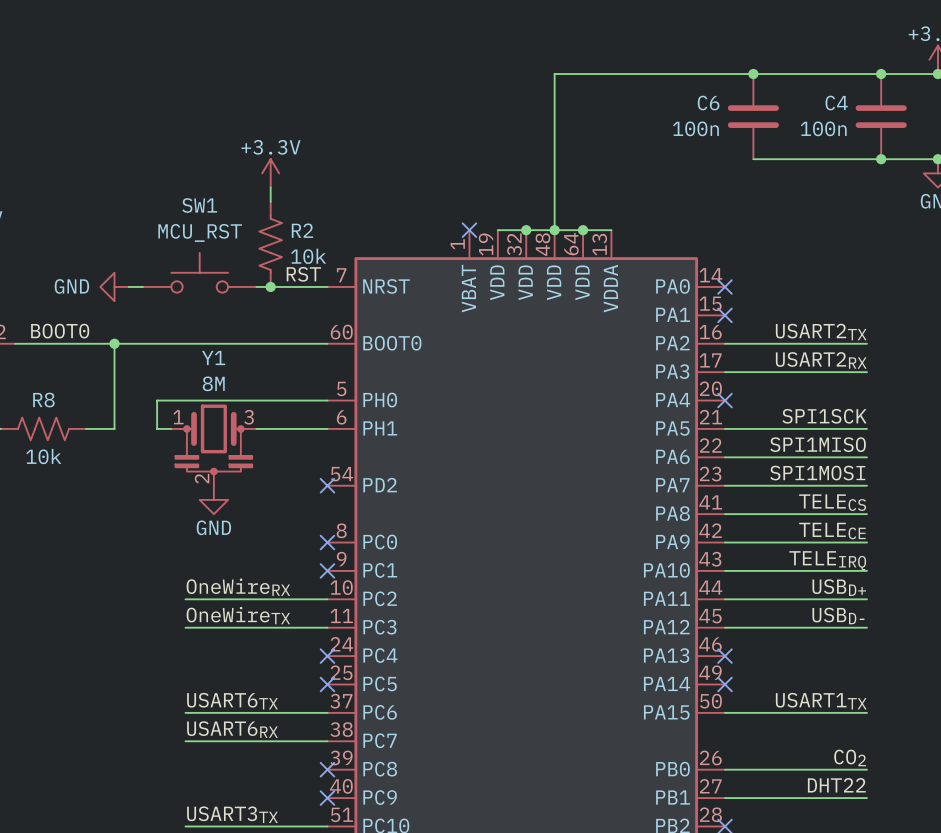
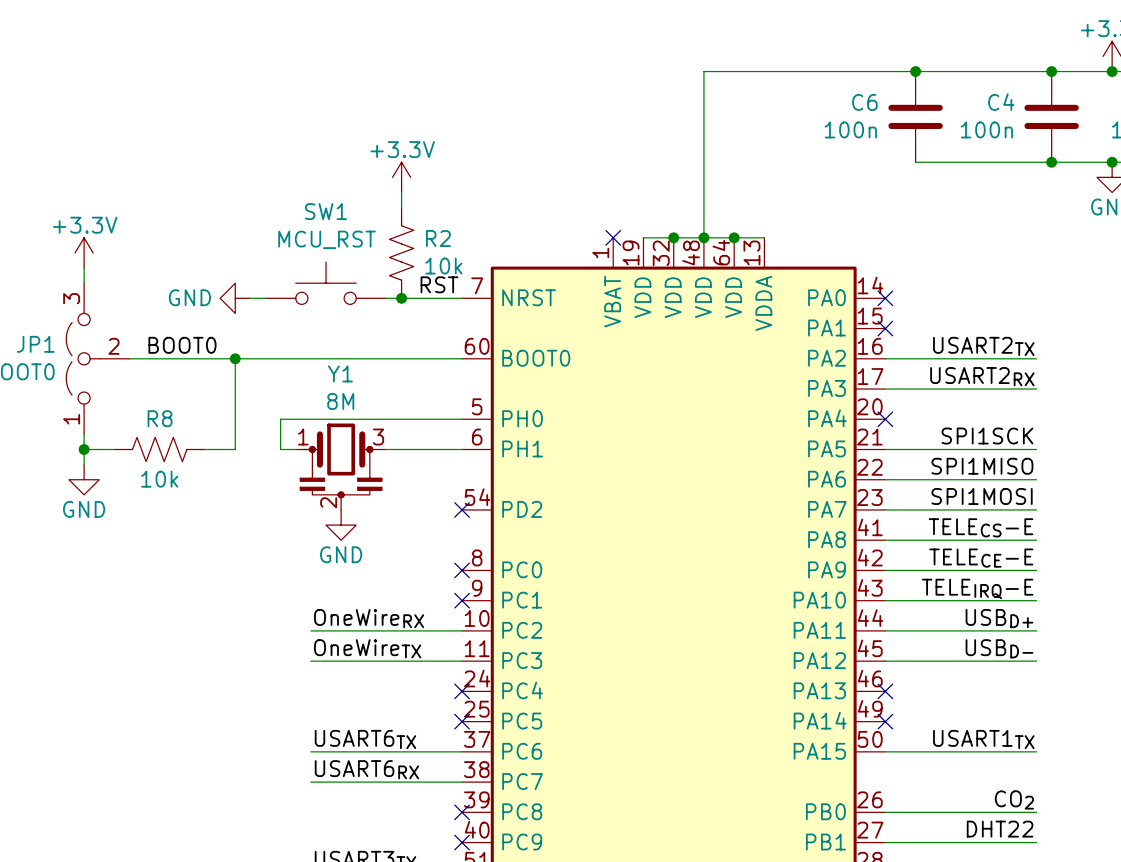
label: TELECS (832, 502) -> TELECS-E (981, 527)
label: TELECE (832, 531) -> TELECE-E (981, 558)
label: TELEIRQ (827, 560) -> TELEIRQ-E (977, 588)

